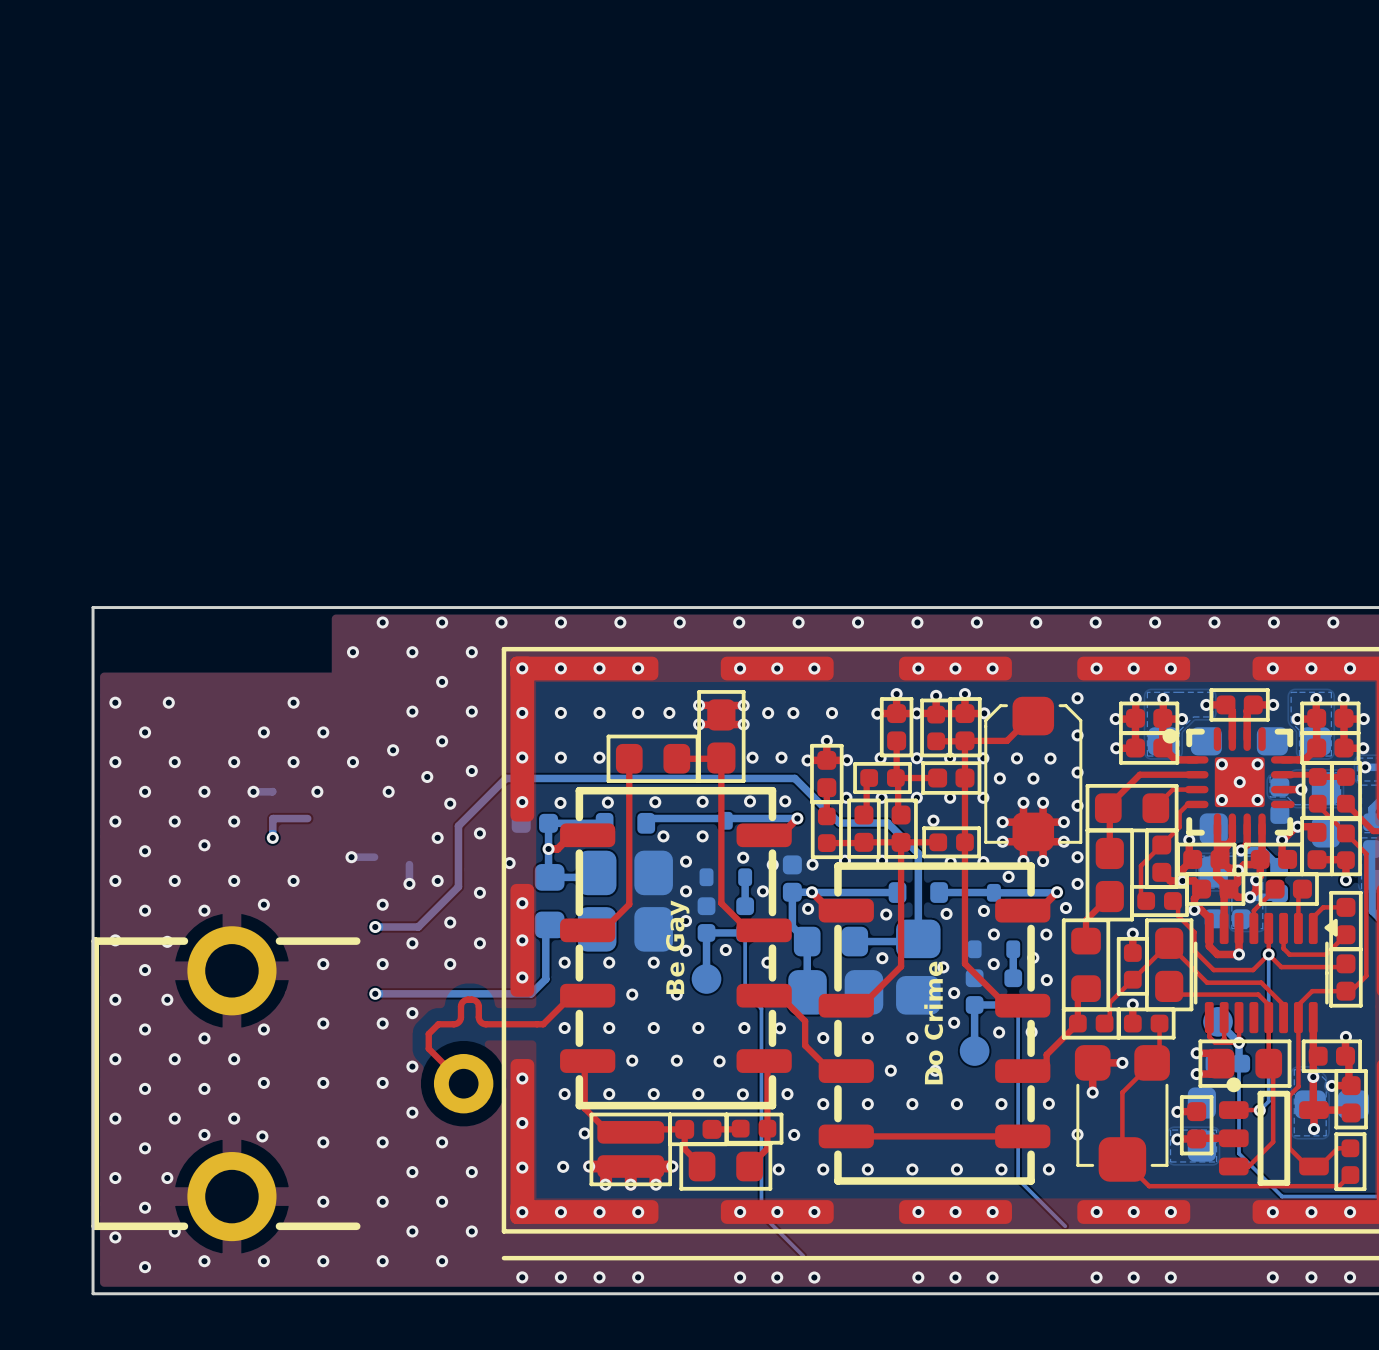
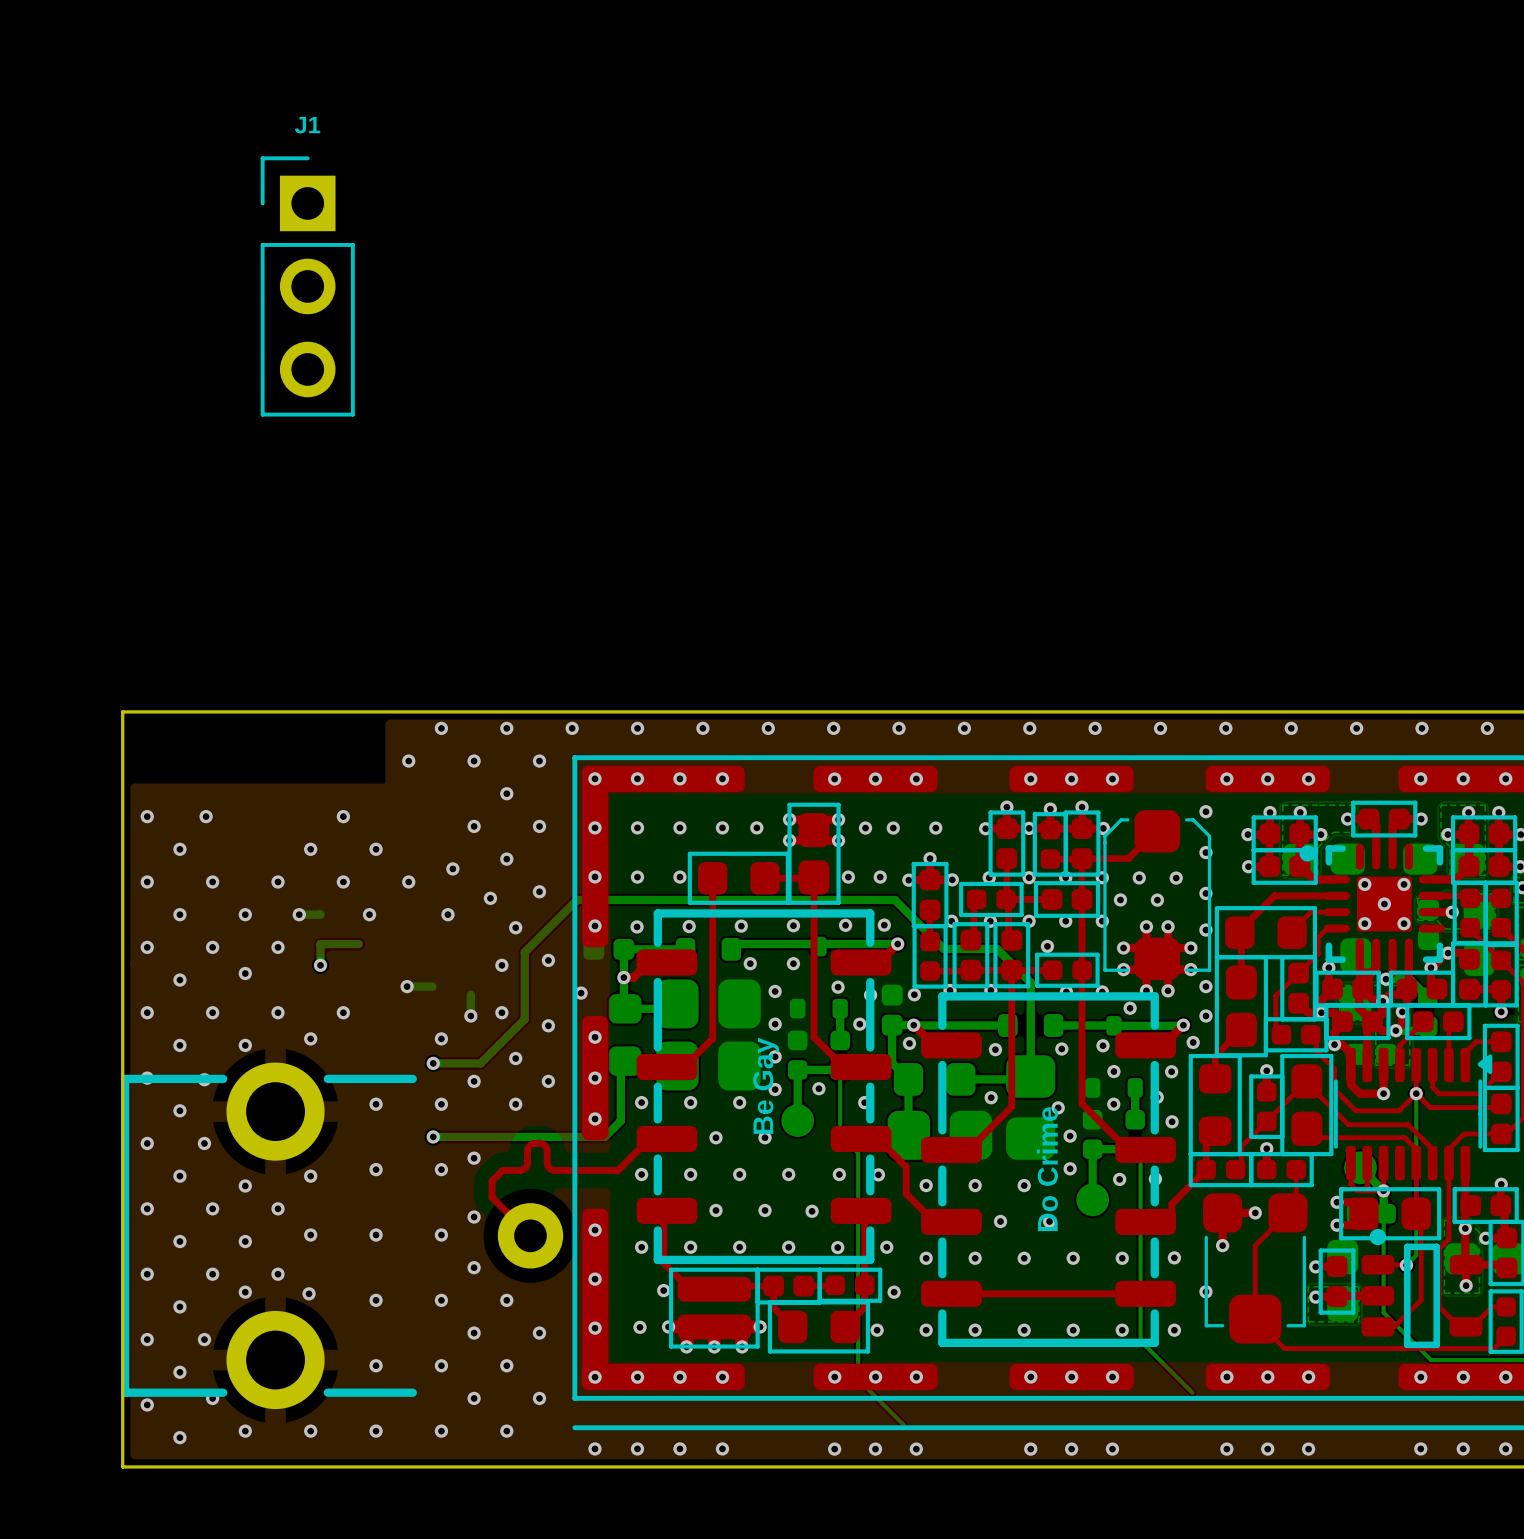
J1: none -> (307, 286)

